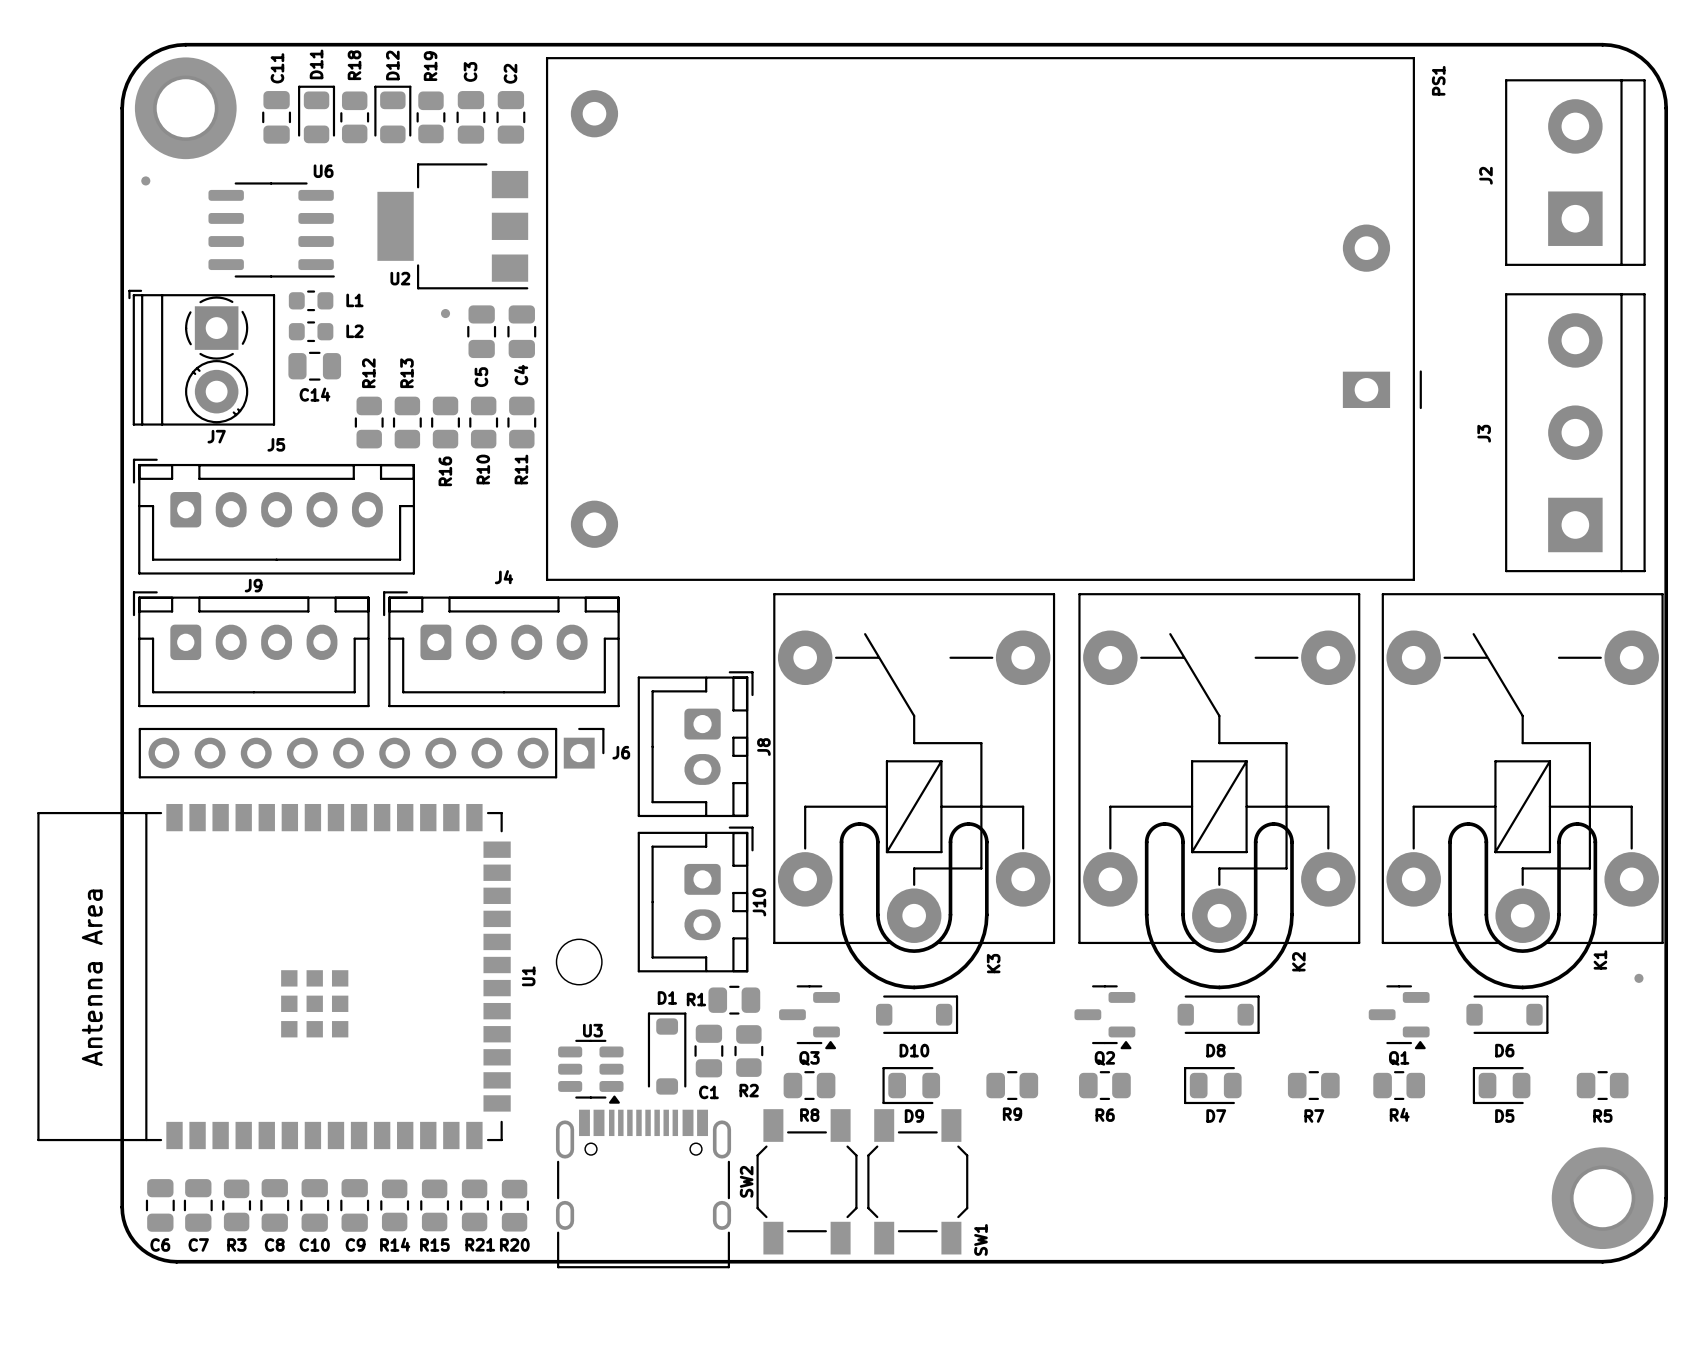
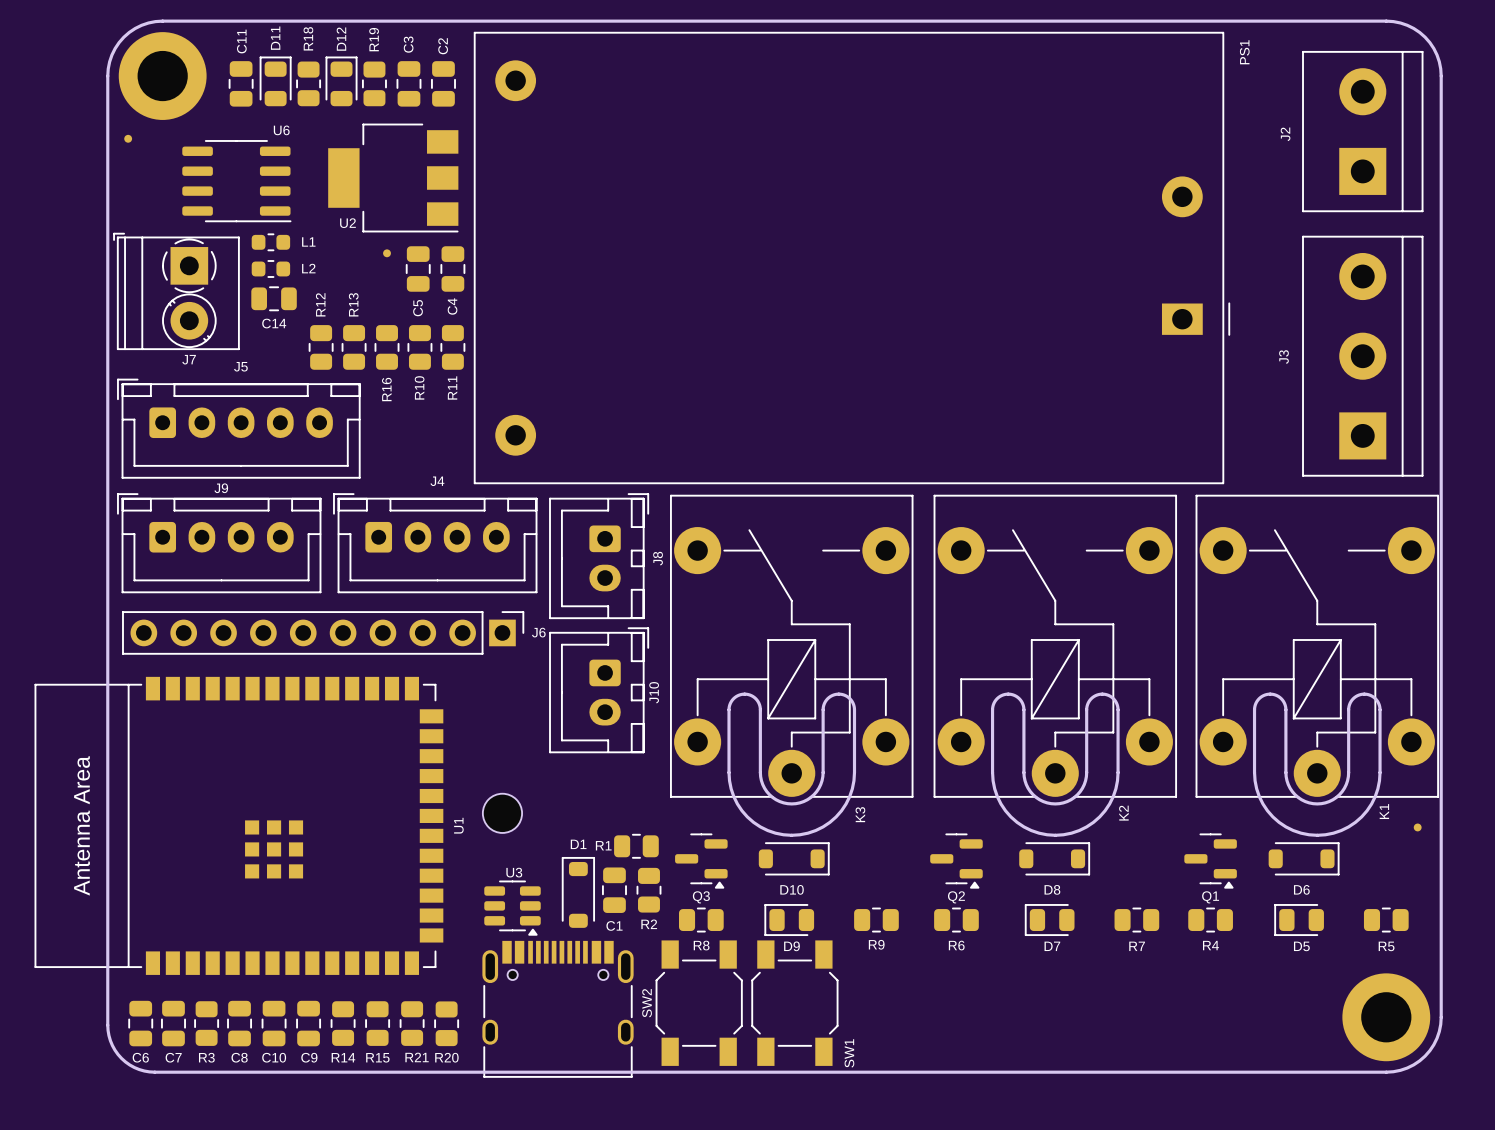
J8 position: (695, 744) -> (599, 556)
J10 position: (695, 899) -> (599, 690)

